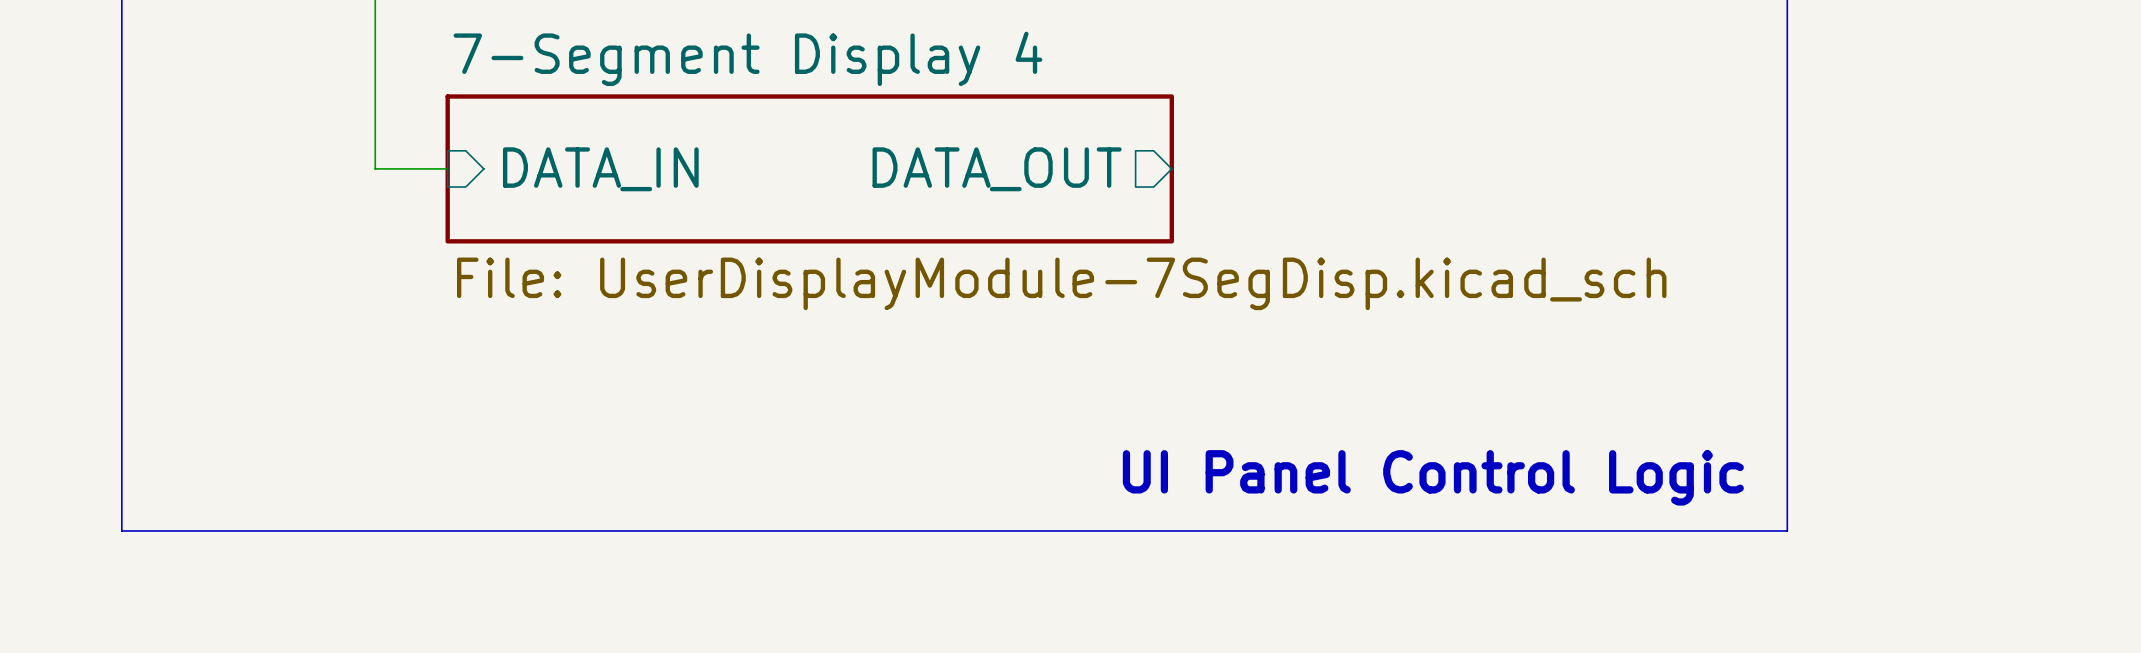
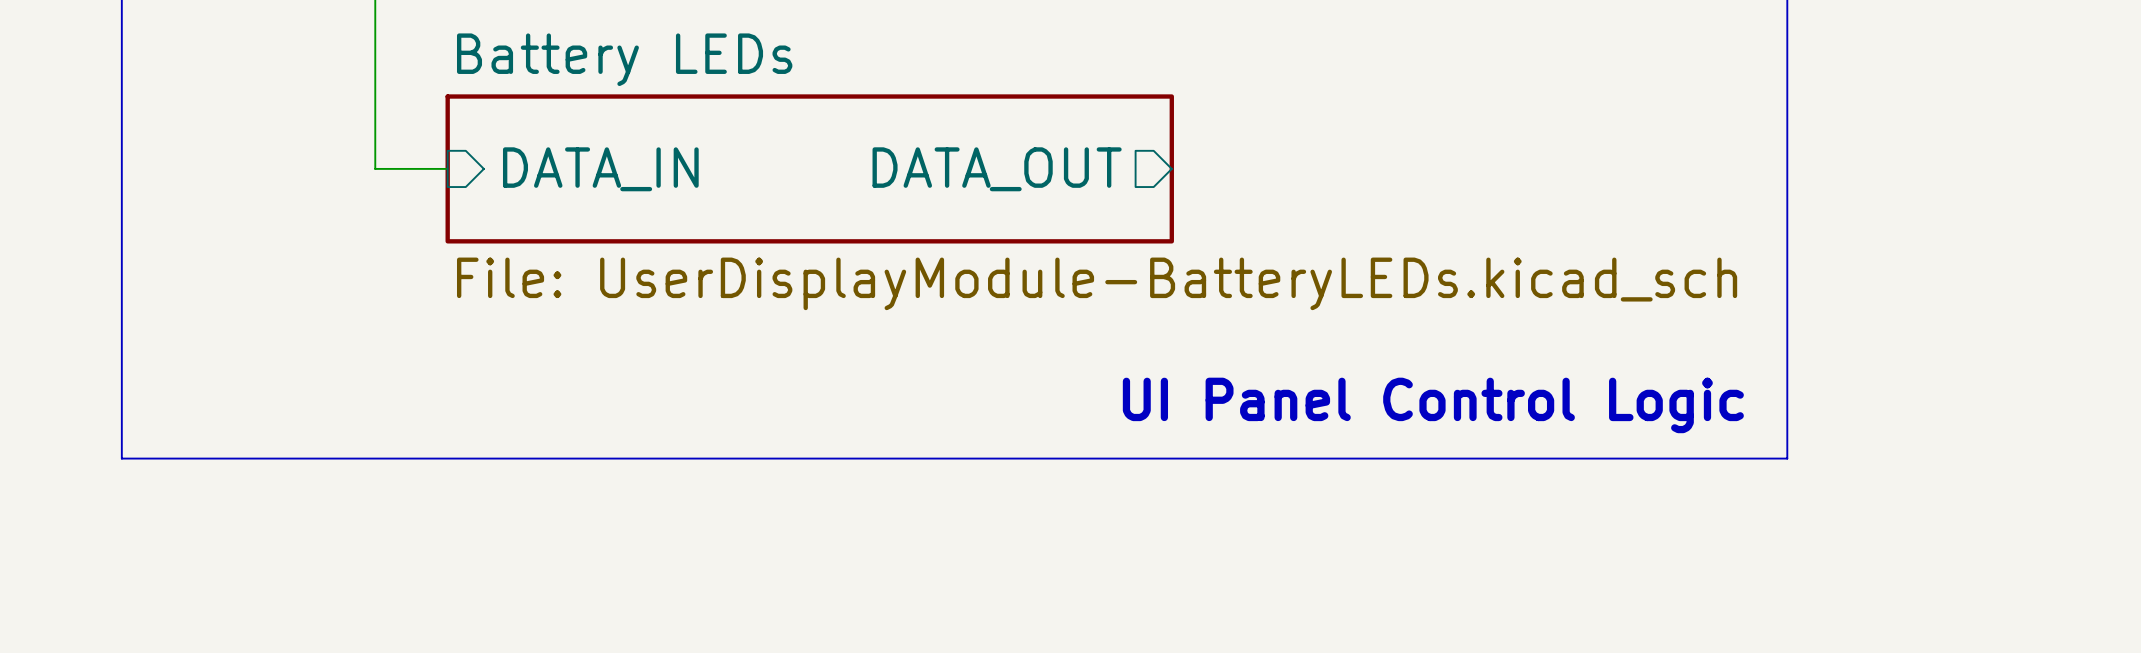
sheet 7-Segment Display 4 name: 7-Segment Display 4 (747, 58) -> Battery LEDs (624, 59)
sheet 7-Segment Display 4 value: File: UserDisplayModule-7SegDisp.kicad_sch (1061, 283) -> File: UserDisplayModule-BatteryLEDs.kicad_sch (1097, 283)
line: (121, 458) (121, 530) (1787, 530) (1787, 458) -> (121, 458) (1787, 458)
text position: UI Panel Control Logic (1433, 477) -> UI Panel Control Logic (1433, 405)

